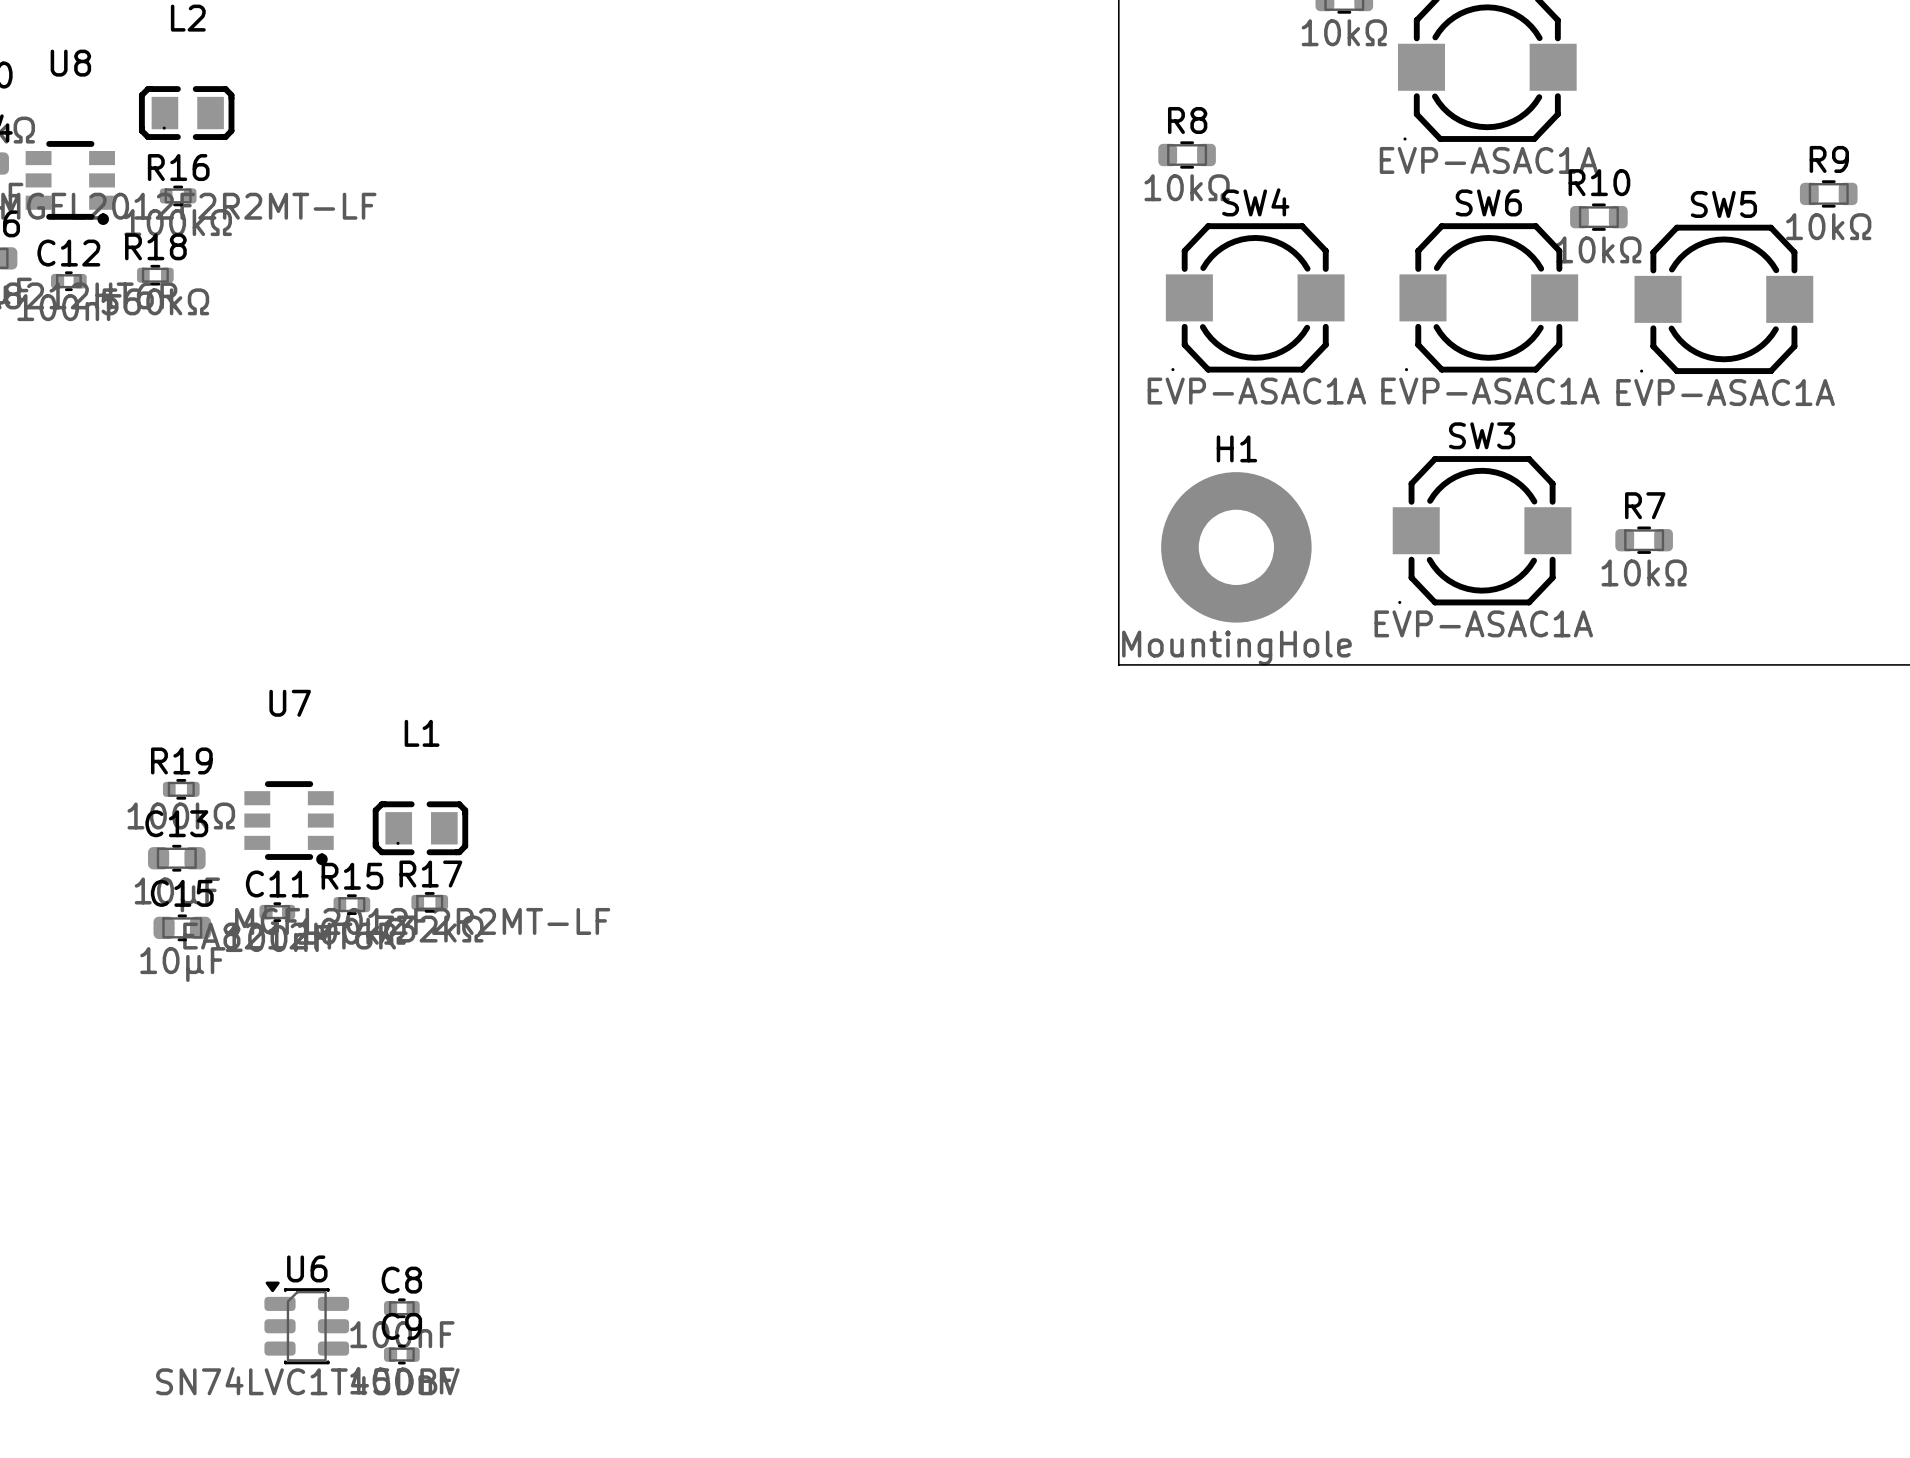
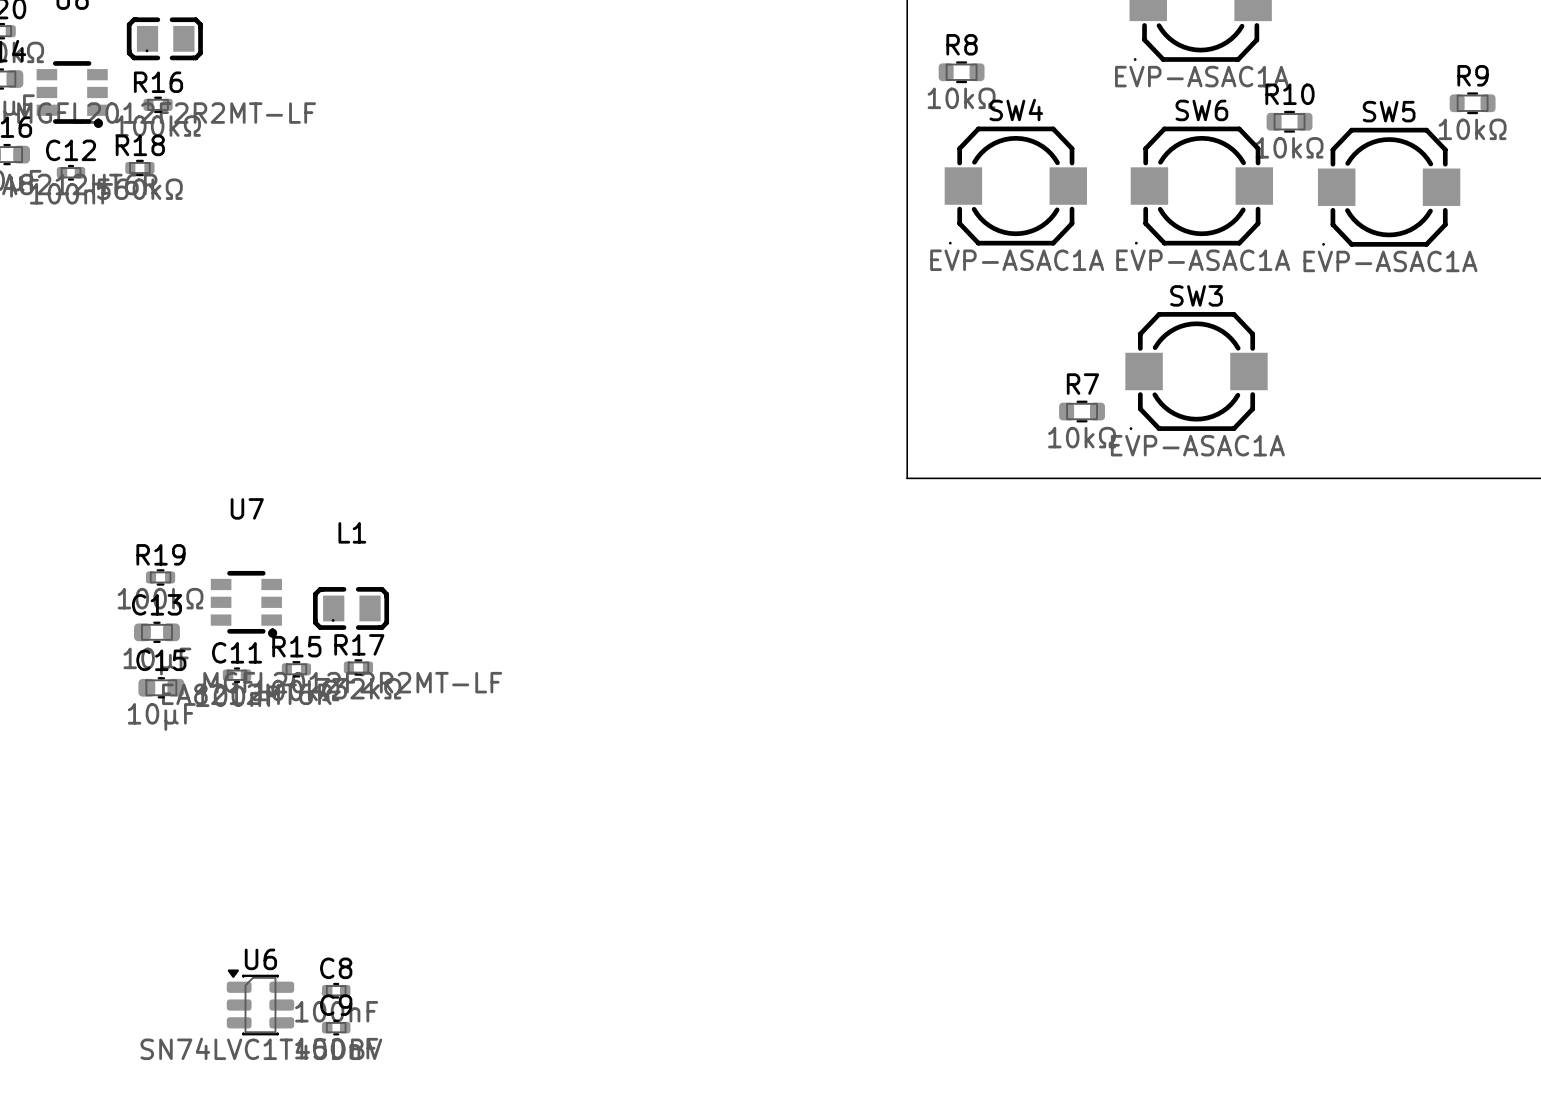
R7 position: (1644, 540) -> (1082, 411)
H1: MountingHole (1236, 547) -> none

